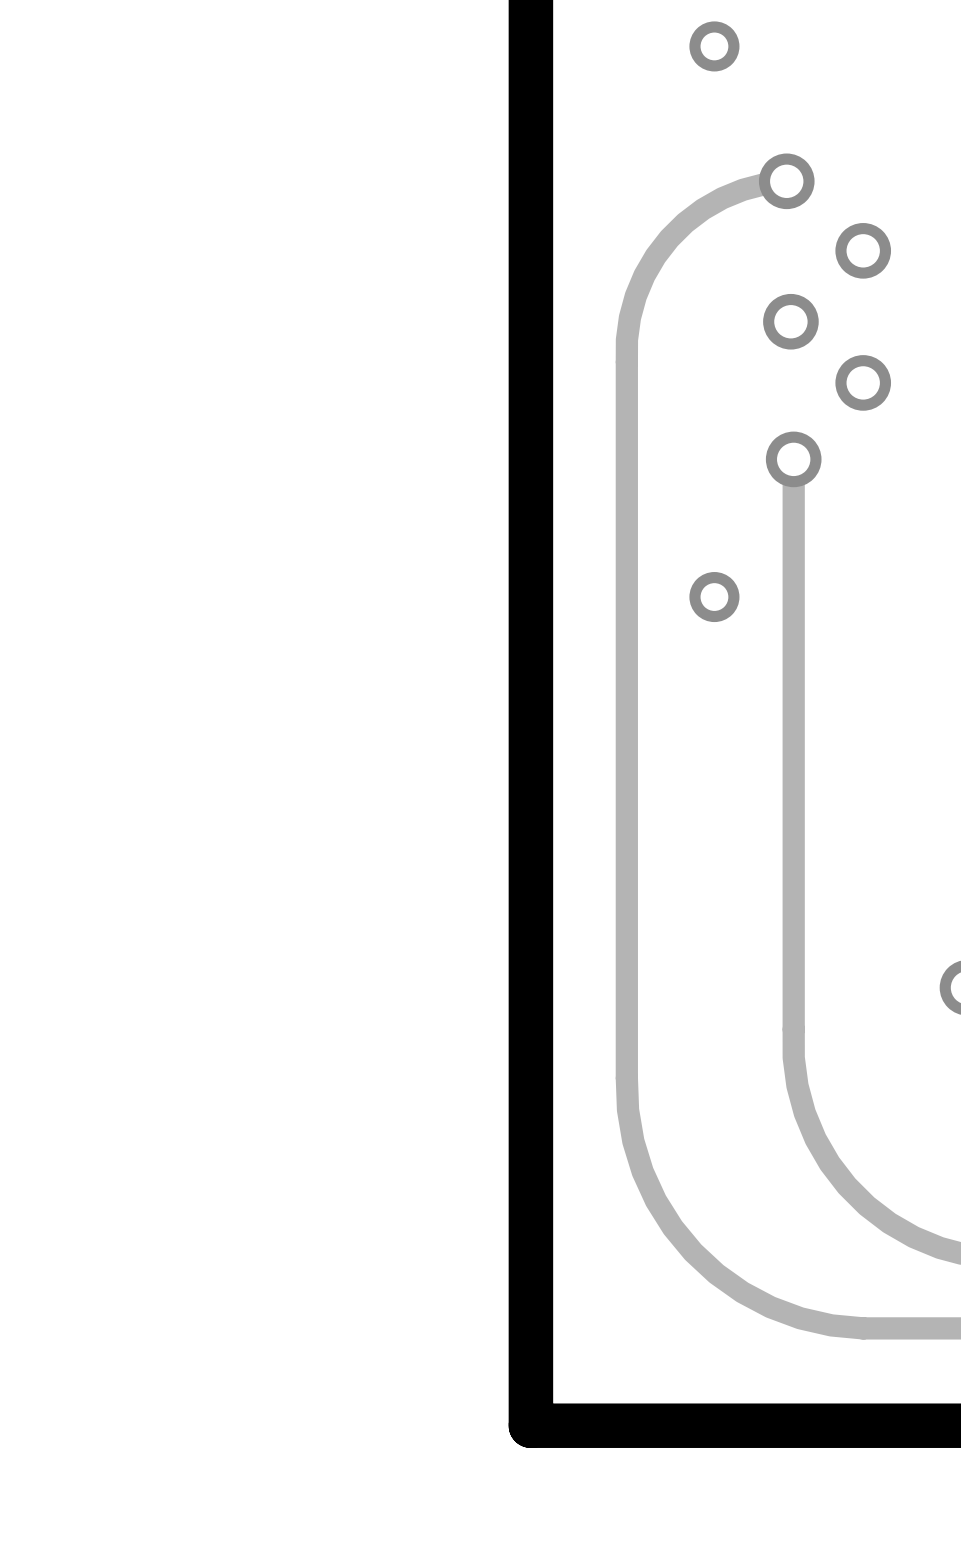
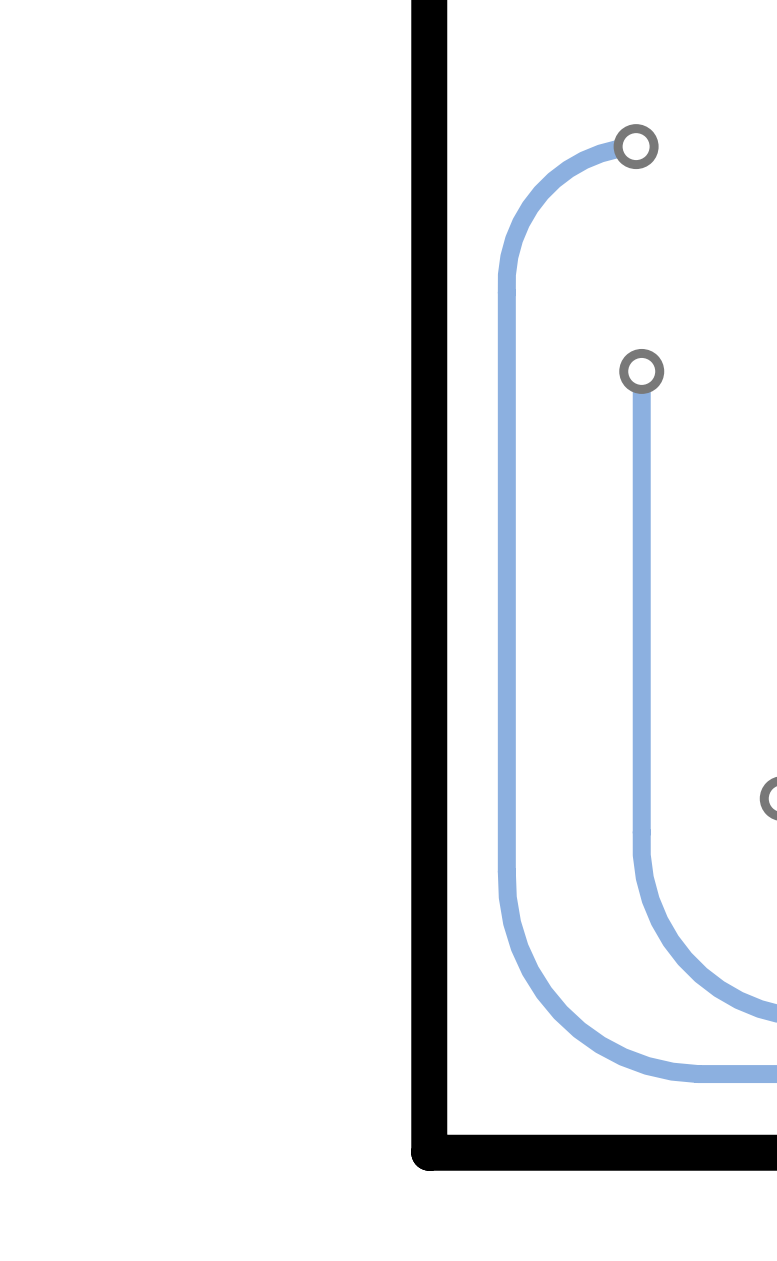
via: (714, 46) -> none
via: (863, 250) -> none
via: (790, 321) -> none
via: (863, 382) -> none
via: (714, 597) -> none

